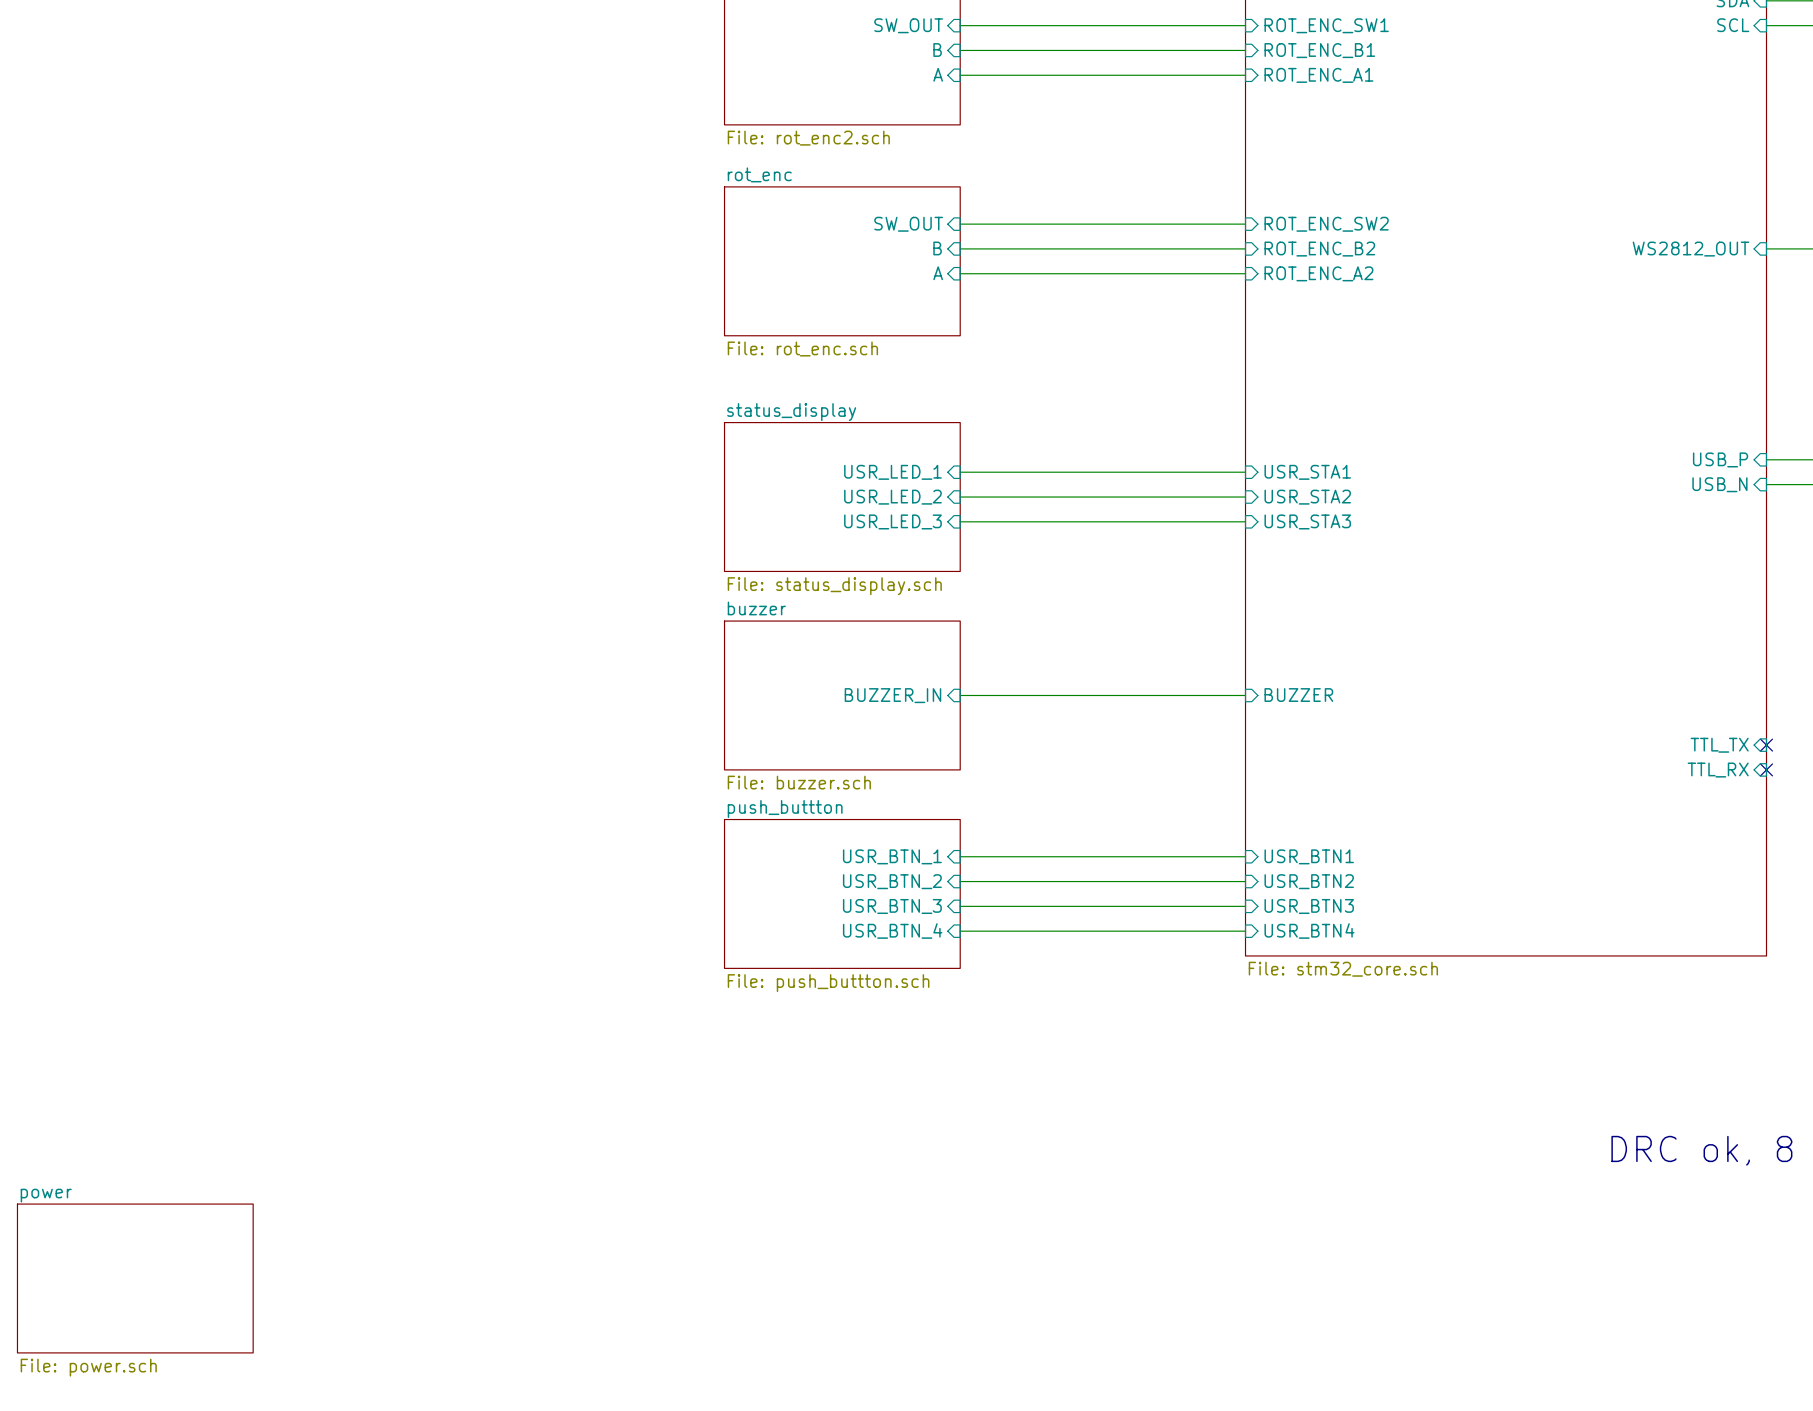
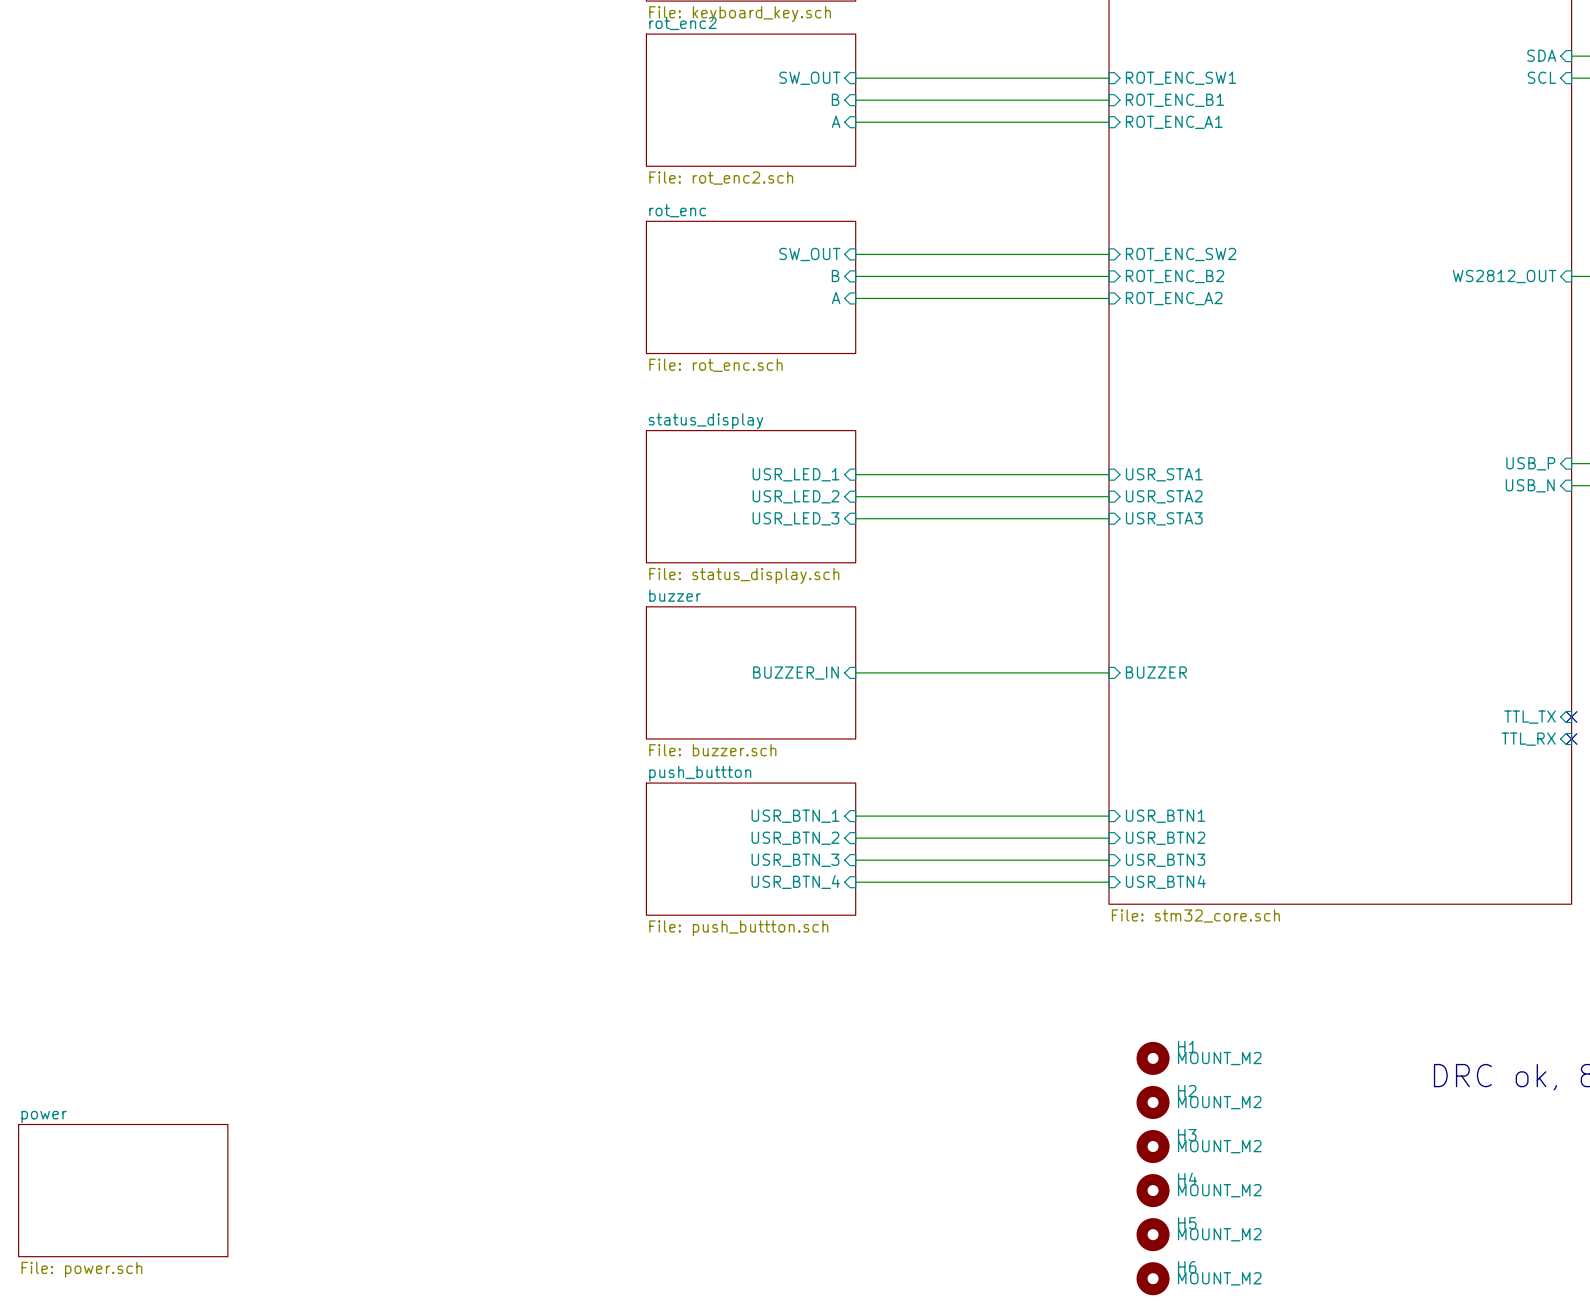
H1: none -> MOUNT_M2 (1153, 1058)
H2: none -> MOUNT_M2 (1153, 1102)
H3: none -> MOUNT_M2 (1153, 1146)
H4: none -> MOUNT_M2 (1153, 1190)
H5: none -> MOUNT_M2 (1153, 1234)
H6: none -> MOUNT_M2 (1153, 1278)

